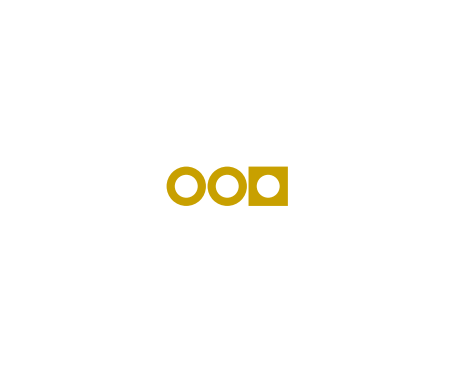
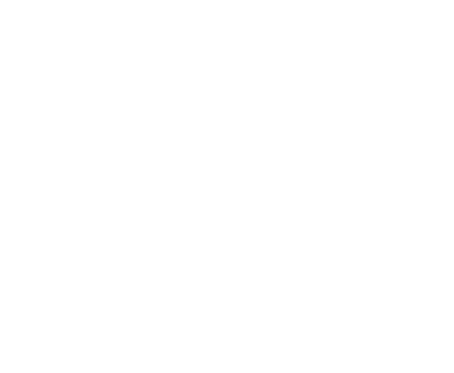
part: (227, 186) -> none

